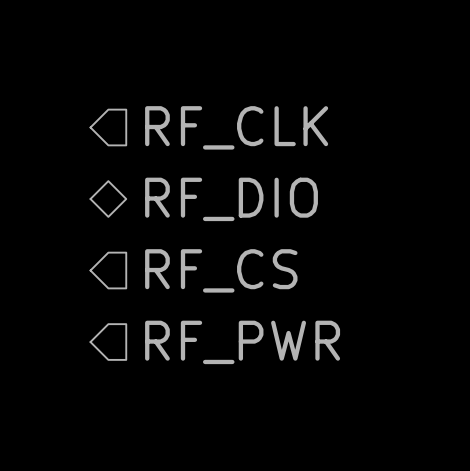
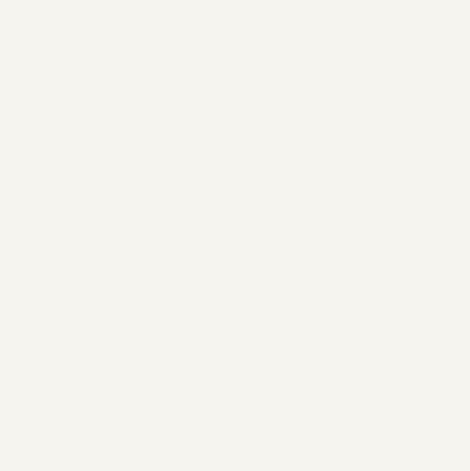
hierarchical label: RF_CLK (236, 127) -> none
hierarchical label: RF_DIO (231, 199) -> none
hierarchical label: RF_CS (221, 270) -> none
hierarchical label: RF_PWR (242, 342) -> none

